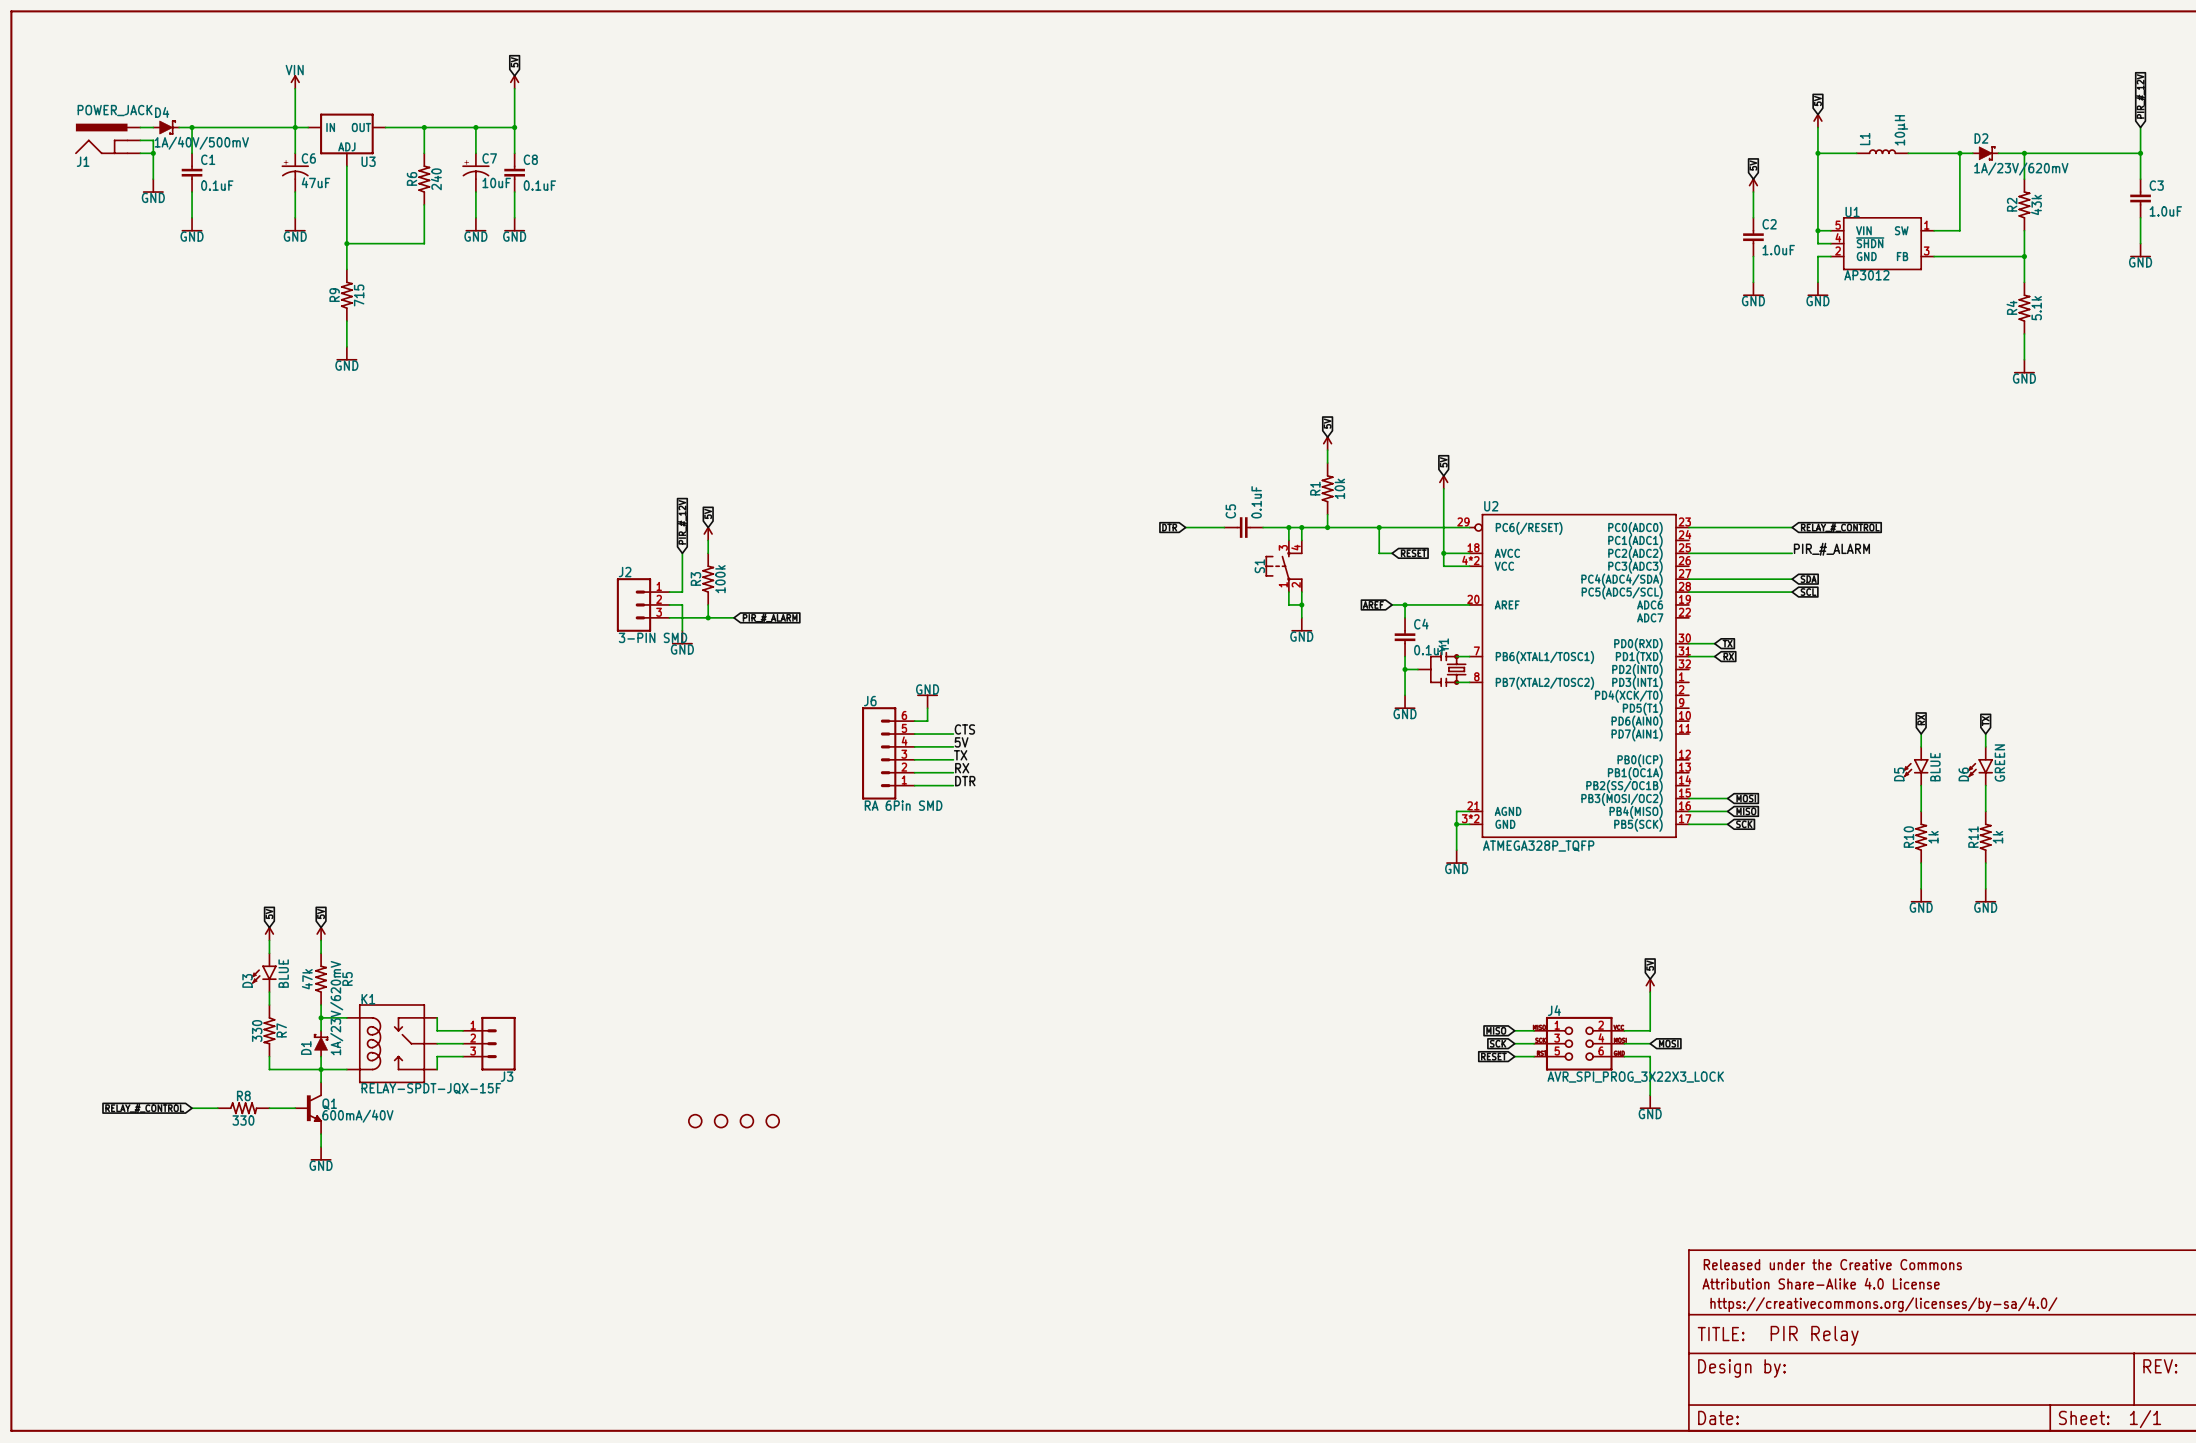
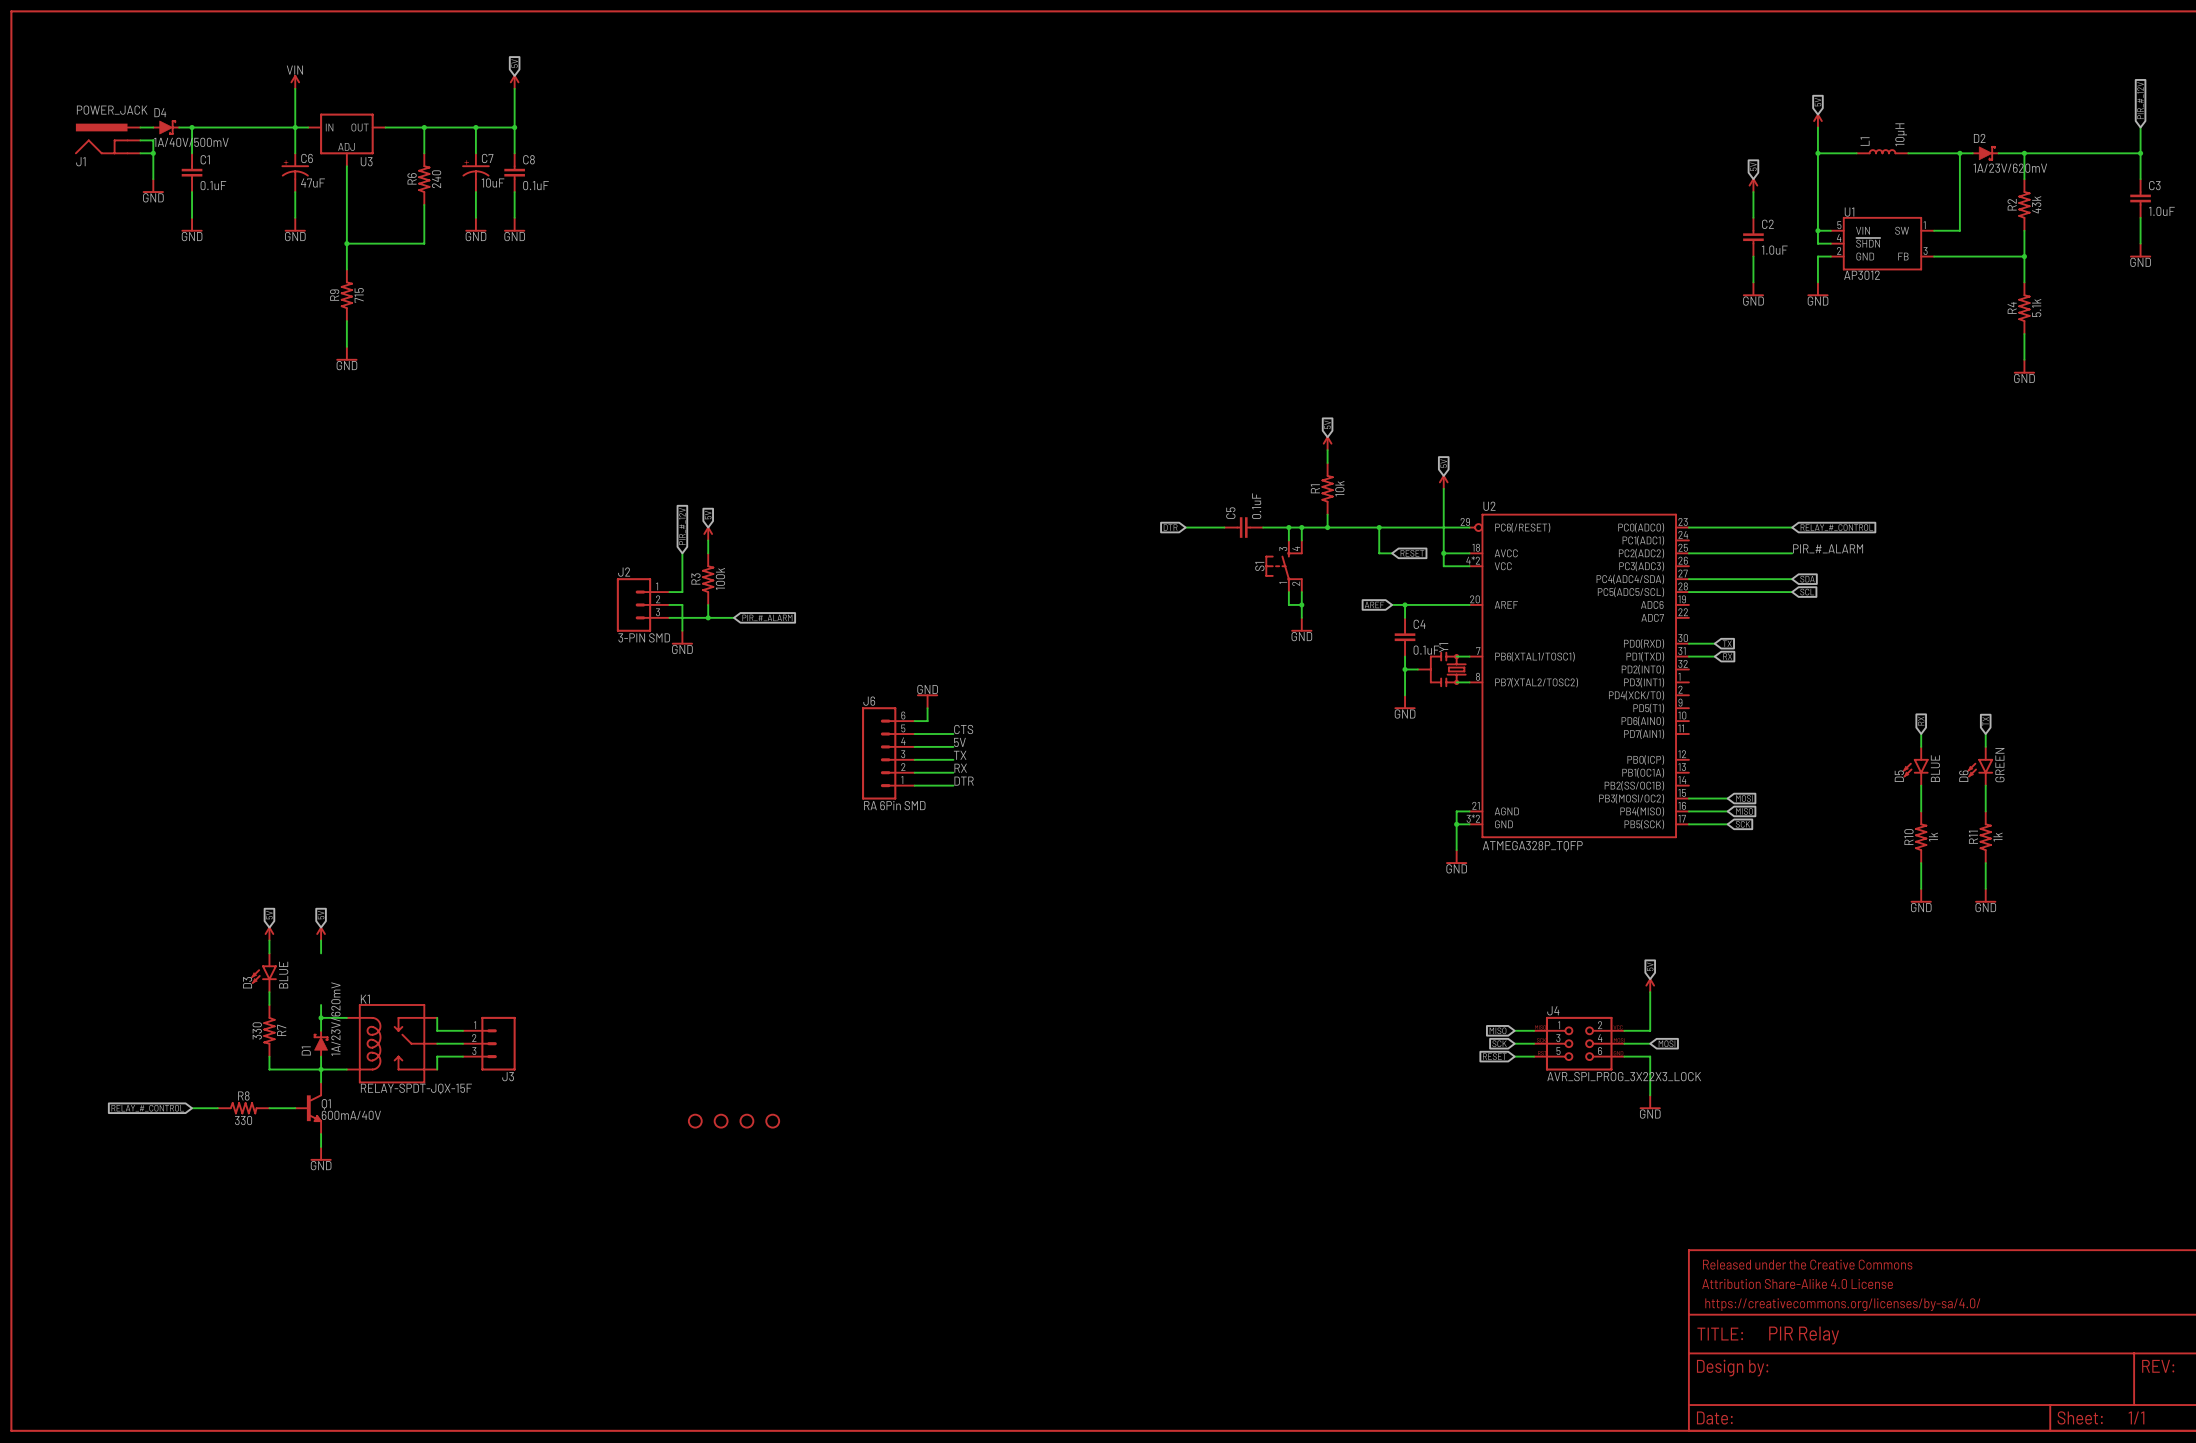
R5: 47k (321, 979) -> none

